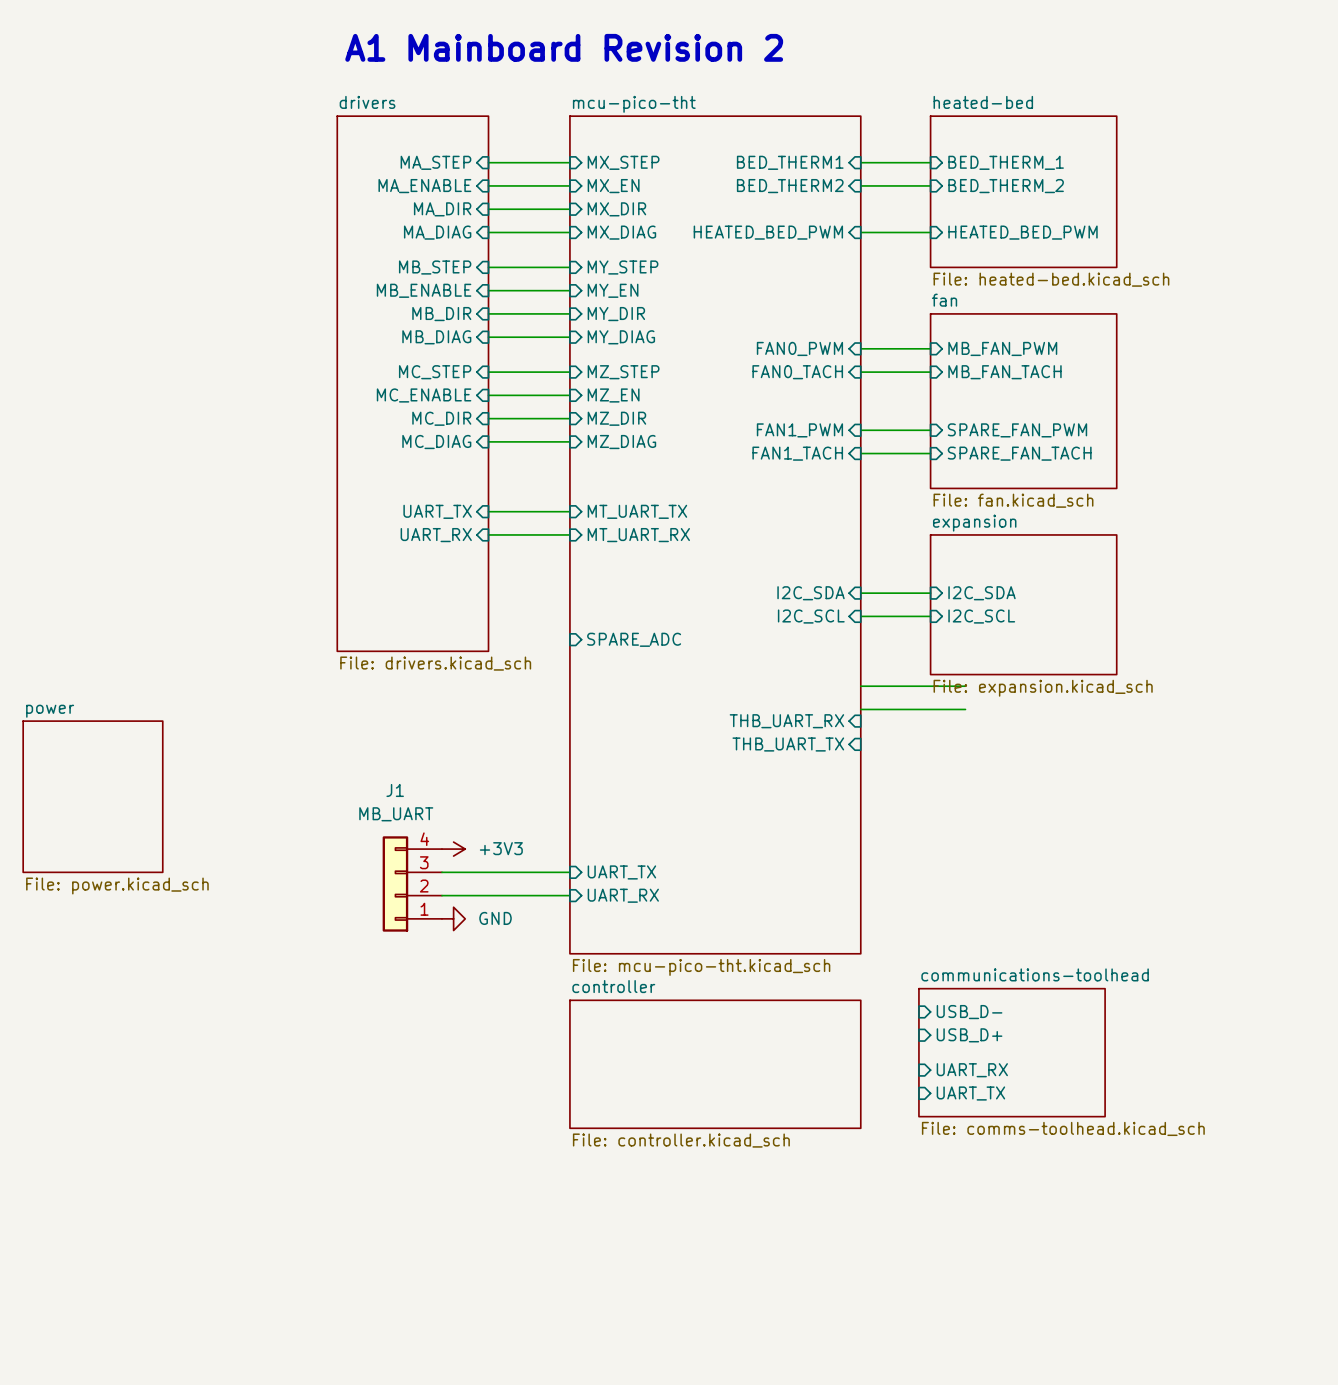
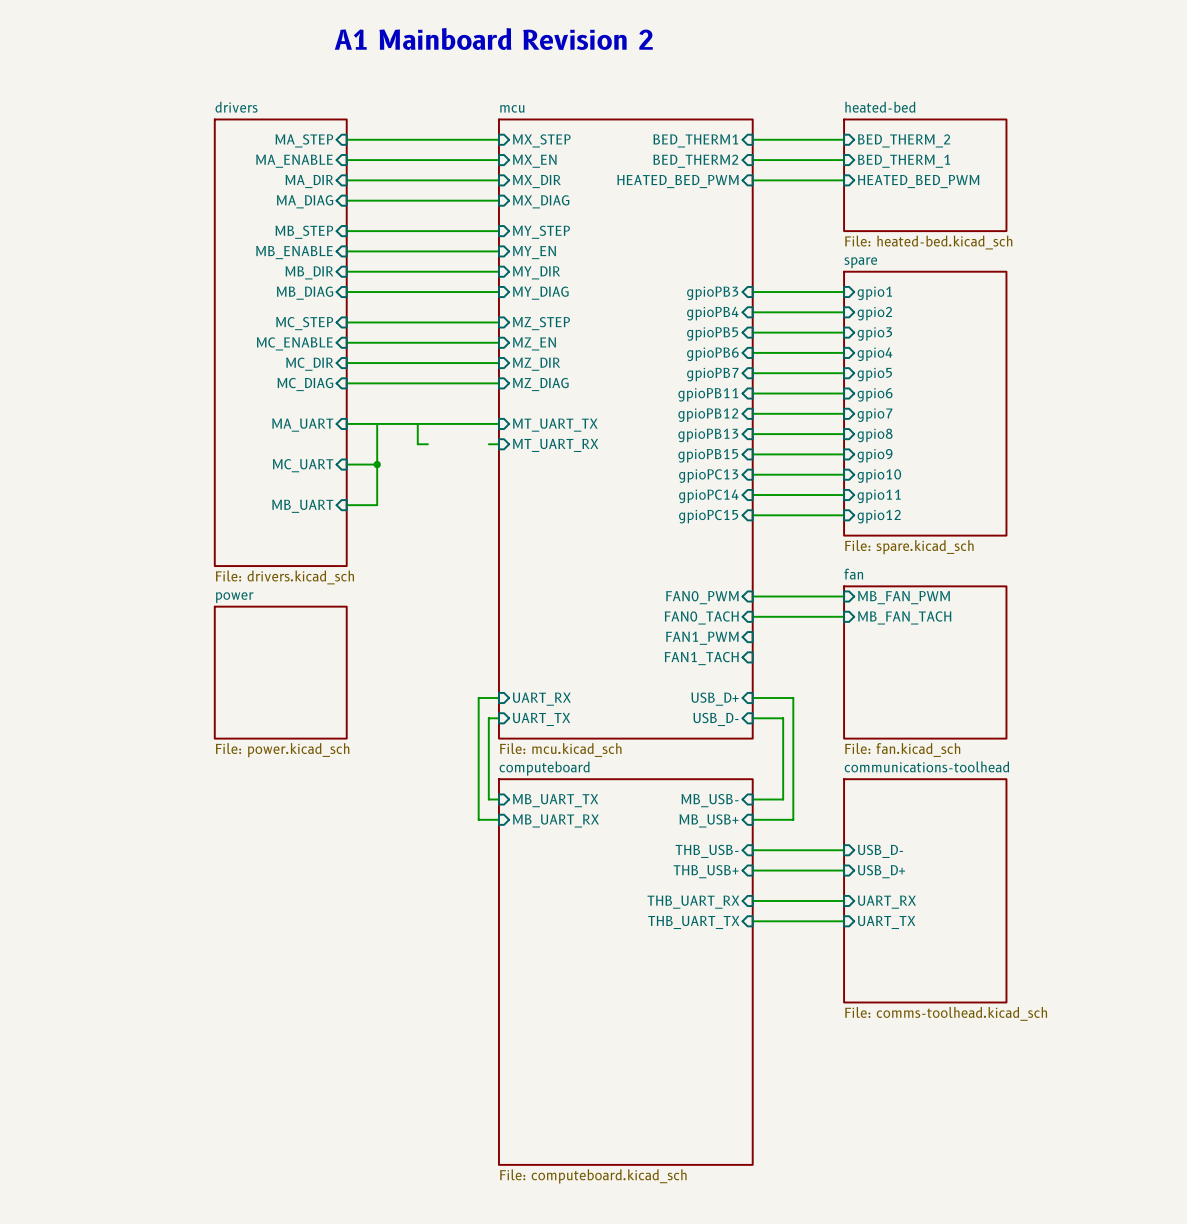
wire: none -> (346, 139) (427, 139)
sheet pin position: MA_STEP (435, 162) -> MA_STEP (304, 140)
wire: none -> (813, 139) (844, 139)
sheet pin position: BED_THERM_1 (1006, 162) -> BED_THERM_1 (904, 161)
wire: none -> (346, 160) (427, 160)
wire: none -> (813, 160) (844, 160)
sheet pin position: MA_ENABLE (424, 186) -> MA_ENABLE (294, 161)
sheet pin position: BED_THERM_2 (1006, 186) -> BED_THERM_2 (904, 140)
sheet heated-bed: File: heated-bed.kicad_sch (1023, 191) -> none
sheet heated-bed: none -> File: heated-bed.kicad_sch (925, 175)
wire: none -> (346, 180) (427, 180)
sheet pin position: MA_DIR (442, 209) -> MA_DIR (309, 181)
wire: none -> (752, 180) (844, 180)
wire: none -> (346, 200) (427, 200)
sheet pin position: MA_DIAG (437, 232) -> MA_DIAG (305, 201)
sheet pin position: HEATED_BED_PWM (768, 232) -> HEATED_BED_PWM (677, 181)
wire: (860, 232) (930, 232) -> none
sheet pin position: HEATED_BED_PWM (1023, 232) -> HEATED_BED_PWM (918, 181)
wire: none -> (346, 231) (427, 231)
sheet pin position: MB_STEP (435, 267) -> MB_STEP (304, 232)
wire: none -> (346, 251) (427, 251)
sheet pin position: MB_ENABLE (424, 290) -> MB_ENABLE (294, 252)
wire: none -> (346, 271) (427, 271)
sheet pin position: MB_DIR (441, 314) -> MB_DIR (309, 272)
wire: none -> (346, 292) (427, 292)
sheet pin position: MB_DIAG (436, 337) -> MB_DIAG (305, 293)
wire: none -> (752, 292) (844, 292)
sheet pin: none -> gpioPB3 (712, 293)
sheet pin: none -> gpio1 (874, 293)
sheet pin: FAN0_PWM (799, 348) -> none
wire: (860, 348) (930, 348) -> none
sheet pin: MB_FAN_PWM (1002, 348) -> none
wire: none -> (752, 312) (844, 312)
sheet pin: none -> gpioPB4 (712, 313)
sheet pin: none -> gpio2 (874, 313)
wire: none -> (346, 322) (427, 322)
sheet pin position: MC_STEP (435, 372) -> MC_STEP (304, 323)
sheet pin: FAN0_TACH (797, 372) -> none
wire: (860, 372) (930, 372) -> none
sheet pin: MB_FAN_TACH (1005, 372) -> none
sheet drivers: File: drivers.kicad_sch (412, 383) -> none
wire: none -> (752, 332) (844, 332)
sheet pin: none -> gpioPB5 (712, 333)
sheet pin: none -> gpio3 (874, 334)
sheet drivers: none -> File: drivers.kicad_sch (280, 342)
wire: none -> (346, 342) (427, 342)
sheet pin position: MC_ENABLE (424, 395) -> MC_ENABLE (294, 343)
sheet fan: File: fan.kicad_sch (1023, 401) -> none
wire: none -> (752, 352) (844, 352)
sheet pin: none -> gpioPB6 (712, 354)
sheet pin: none -> gpio4 (874, 354)
wire: none -> (346, 363) (427, 363)
sheet pin position: MC_DIR (441, 418) -> MC_DIR (309, 364)
sheet pin: FAN1_PWM (799, 430) -> gpioPB7 (712, 374)
wire: none -> (813, 373) (844, 373)
sheet pin: SPARE_FAN_PWM (1017, 430) -> none
sheet pin: none -> gpio5 (874, 374)
wire: none -> (346, 383) (427, 383)
sheet pin position: MC_DIAG (436, 442) -> MC_DIAG (305, 384)
sheet pin: FAN1_TACH (797, 453) -> gpioPB11 (708, 394)
wire: none -> (813, 393) (844, 393)
sheet pin: SPARE_FAN_TACH (1019, 453) -> none
sheet pin: none -> gpio6 (875, 394)
sheet spare: none -> File: spare.kicad_sch (925, 403)
wire: none -> (752, 413) (844, 413)
sheet pin: none -> gpioPB12 (708, 415)
sheet pin: none -> gpio7 (874, 415)
sheet pin: none -> MA_UART (302, 425)
wire: none -> (346, 423) (498, 423)
wire: none -> (377, 423) (377, 505) (346, 505)
sheet pin: none -> MT_UART_TX (555, 425)
sheet mcu: none -> File: mcu.kicad_sch (625, 429)
wire: none -> (752, 434) (844, 434)
sheet pin: none -> gpioPB13 (708, 435)
sheet pin: none -> gpio8 (875, 435)
sheet pin: UART_TX (437, 511) -> none
wire: (488, 511) (558, 511) -> (427, 444) (417, 444) (417, 423)
sheet pin: MT_UART_TX (637, 511) -> MT_UART_RX (555, 445)
wire: none -> (752, 454) (844, 454)
sheet pin: none -> gpioPB15 (708, 455)
sheet pin: none -> gpio9 (875, 455)
wire: none -> (346, 464) (377, 464)
junction: none -> (377, 464)
wire: (488, 534) (569, 534) -> none
sheet mcu-pico-tht: File: mcu-pico-tht.kicad_sch (715, 534) -> none
sheet pin: none -> MC_UART (303, 465)
sheet pin: UART_RX (436, 535) -> none
sheet pin: MT_UART_RX (638, 535) -> none
wire: none -> (752, 474) (844, 474)
sheet pin: none -> gpioPC13 (708, 476)
sheet pin: none -> gpio10 (879, 476)
wire: none -> (752, 495) (844, 495)
sheet pin: none -> gpioPC14 (708, 496)
sheet pin: none -> gpio11 (879, 496)
sheet pin: none -> MB_UART (302, 506)
sheet pin: I2C_SDA (811, 593) -> gpioPC15 (708, 516)
wire: none -> (813, 515) (844, 515)
sheet pin: I2C_SDA (982, 593) -> none
sheet pin: none -> gpio12 (879, 516)
sheet expansion: File: expansion.kicad_sch (1023, 604) -> none
sheet pin: I2C_SCL (811, 616) -> none
wire: (860, 616) (930, 616) -> none
sheet pin: I2C_SCL (981, 616) -> none
sheet pin: SPARE_ADC (634, 639) -> none
sheet pin: none -> FAN0_PWM (702, 597)
sheet pin: none -> MB_FAN_PWM (903, 597)
sheet pin: none -> FAN0_TACH (701, 617)
sheet pin: none -> MB_FAN_TACH (904, 617)
sheet pin: THB_UART_RX (786, 721) -> none
sheet pin: none -> FAN1_PWM (702, 638)
sheet pin: THB_UART_TX (788, 744) -> none
sheet pin: none -> FAN1_TACH (701, 658)
sheet fan: none -> File: fan.kicad_sch (925, 662)
sheet power: none -> File: power.kicad_sch (280, 672)
sheet power: File: power.kicad_sch (92, 796) -> none
wire: none -> (498, 698) (478, 698) (478, 819) (498, 819)
sheet pin: none -> USB_D+ (714, 699)
wire: none -> (752, 698) (793, 698) (793, 819) (752, 819)
wire: none -> (498, 718) (488, 718) (488, 799) (498, 799)
sheet pin: none -> USB_D- (715, 719)
wire: none -> (752, 718) (783, 718) (783, 799) (752, 799)
power symbol: +3V3 (453, 849) -> none
wire: (441, 872) (569, 872) -> none
sheet pin position: UART_TX (621, 872) -> UART_TX (541, 719)
J1: MB_UART (412, 883) -> none
wire: (441, 895) (569, 895) -> none
sheet pin position: UART_RX (623, 895) -> UART_RX (541, 699)
power symbol: GND (453, 918) -> none
sheet pin: none -> MB_UART_TX (555, 800)
sheet pin: none -> MB_USB- (710, 800)
sheet pin: none -> MB_UART_RX (555, 820)
sheet pin: none -> MB_USB+ (709, 820)
sheet pin: none -> THB_USB- (707, 851)
wire: none -> (752, 850) (844, 850)
sheet pin: none -> THB_USB+ (706, 871)
wire: none -> (752, 870) (844, 870)
sheet pin position: USB_D- (969, 1012) -> USB_D- (880, 851)
sheet communications-toolhead: none -> File: comms-toolhead.kicad_sch (925, 890)
sheet pin: none -> THB_UART_RX (693, 902)
wire: none -> (752, 900) (844, 900)
sheet pin position: USB_D+ (969, 1035) -> USB_D+ (881, 871)
sheet communications-toolhead: File: comms-toolhead.kicad_sch (1012, 1052) -> none
sheet pin: none -> THB_UART_TX (693, 922)
wire: none -> (752, 921) (844, 921)
sheet controller: File: controller.kicad_sch (715, 1064) -> none
sheet pin position: UART_RX (972, 1070) -> UART_RX (886, 902)
sheet pin position: UART_TX (970, 1093) -> UART_TX (886, 922)
sheet computeboard: none -> File: computeboard.kicad_sch (625, 972)

